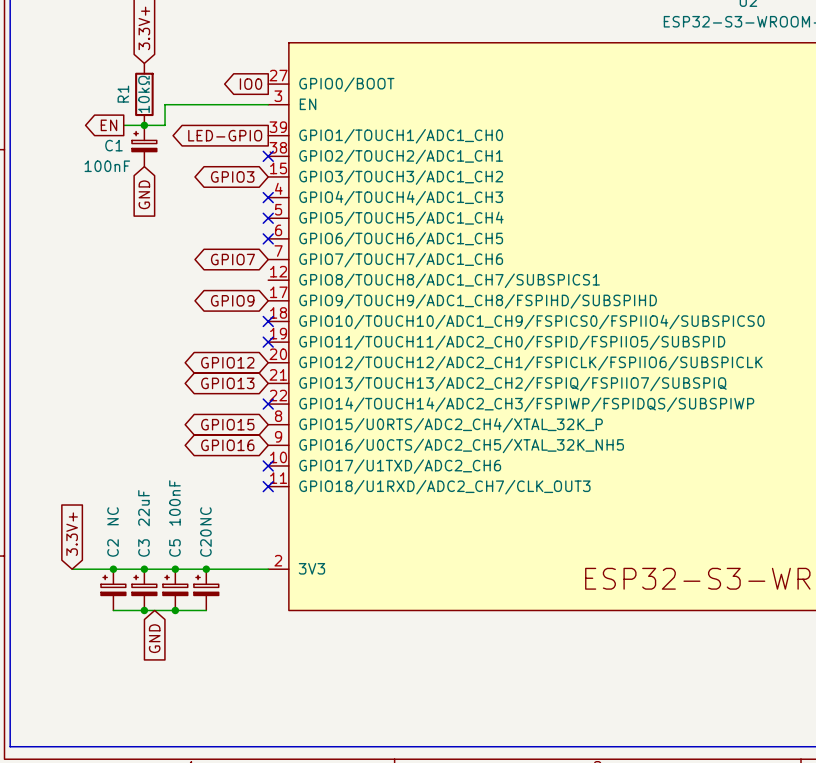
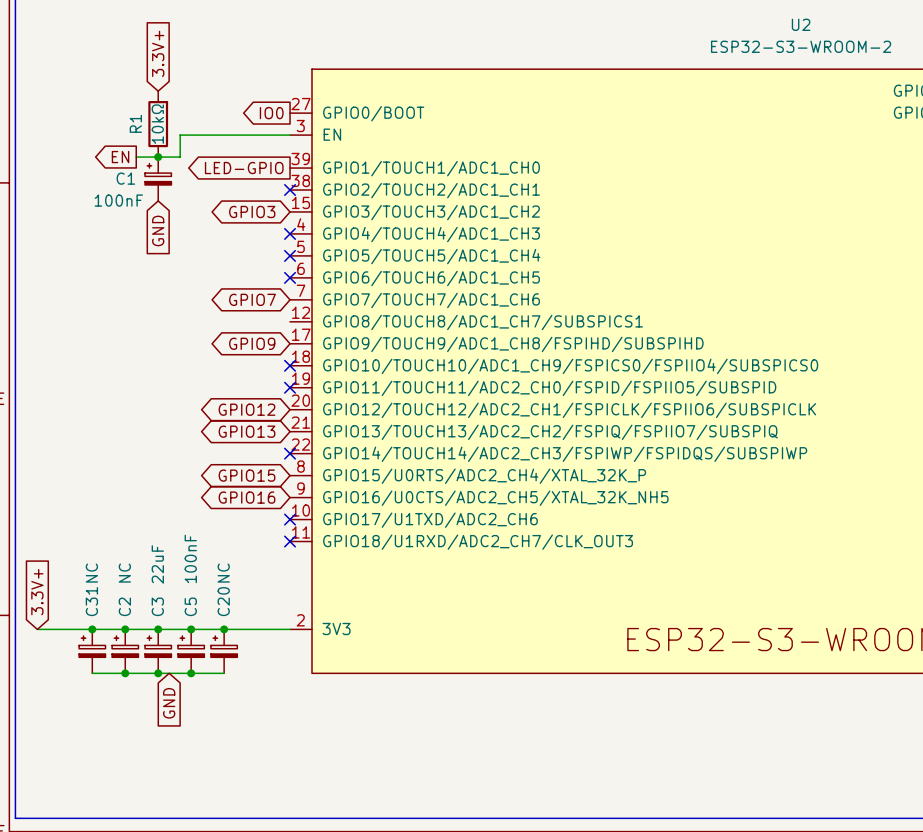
global label position: 3.3V+ (72, 534) -> 3.3V+ (37, 592)
wire: none -> (37, 629) (81, 629)
junction: none -> (92, 629)
C31: none -> NC (92, 651)
wire: none -> (92, 673) (125, 673)
junction: none -> (125, 673)

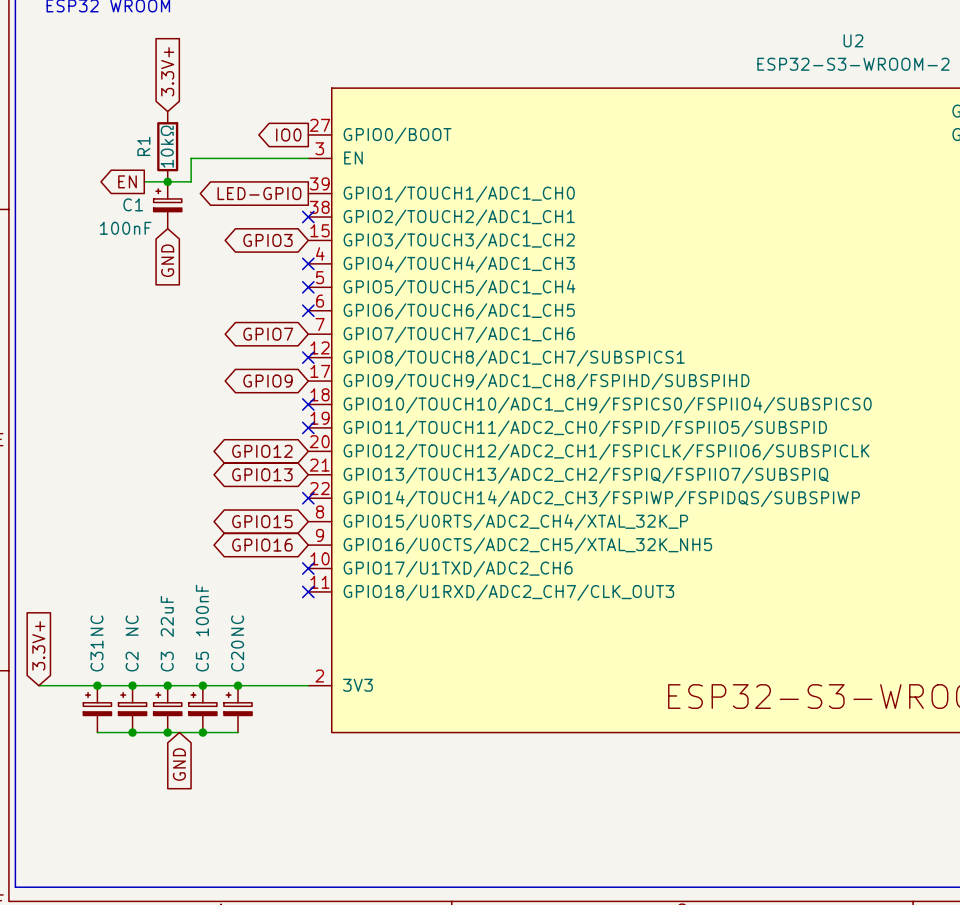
no-connect mark: none -> (308, 357)

